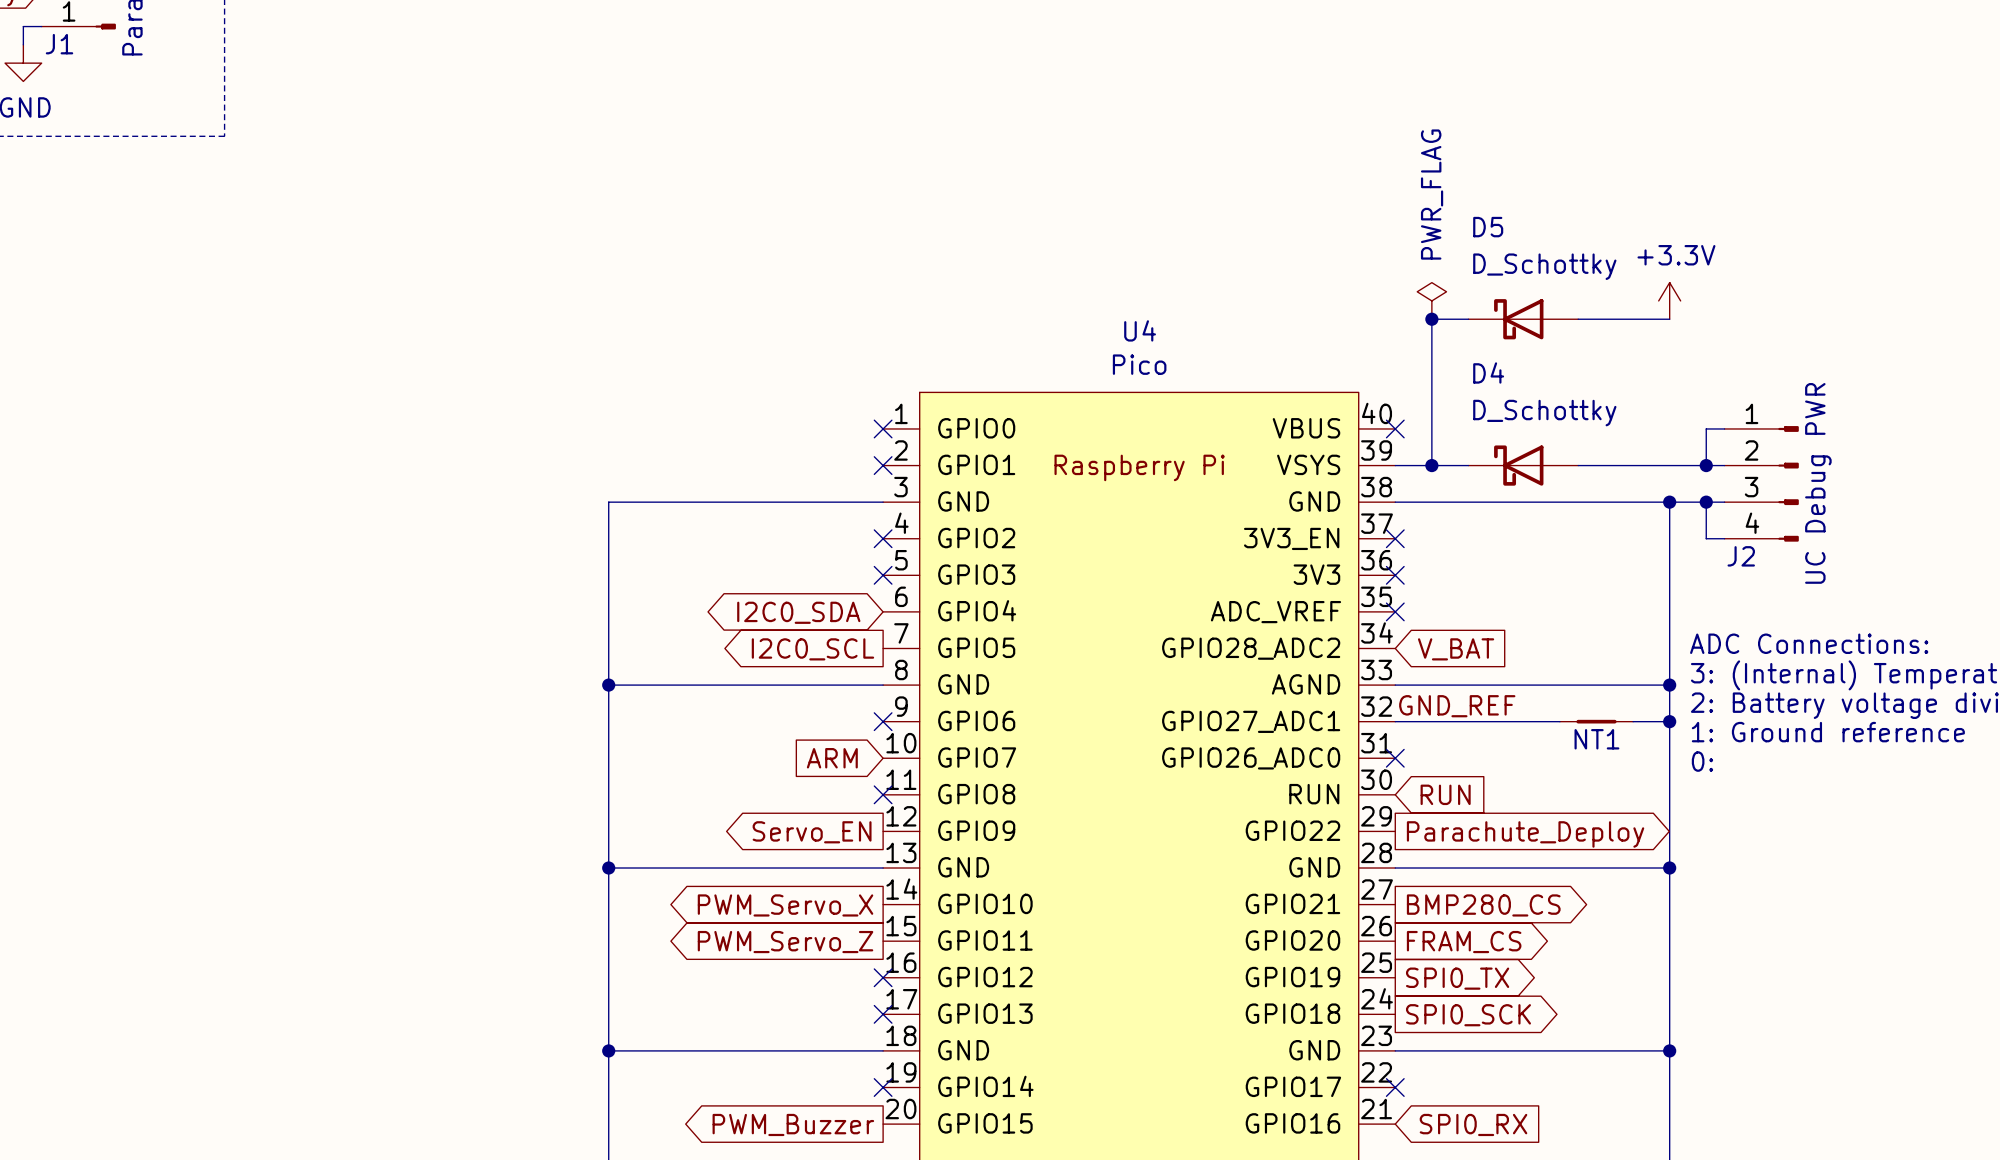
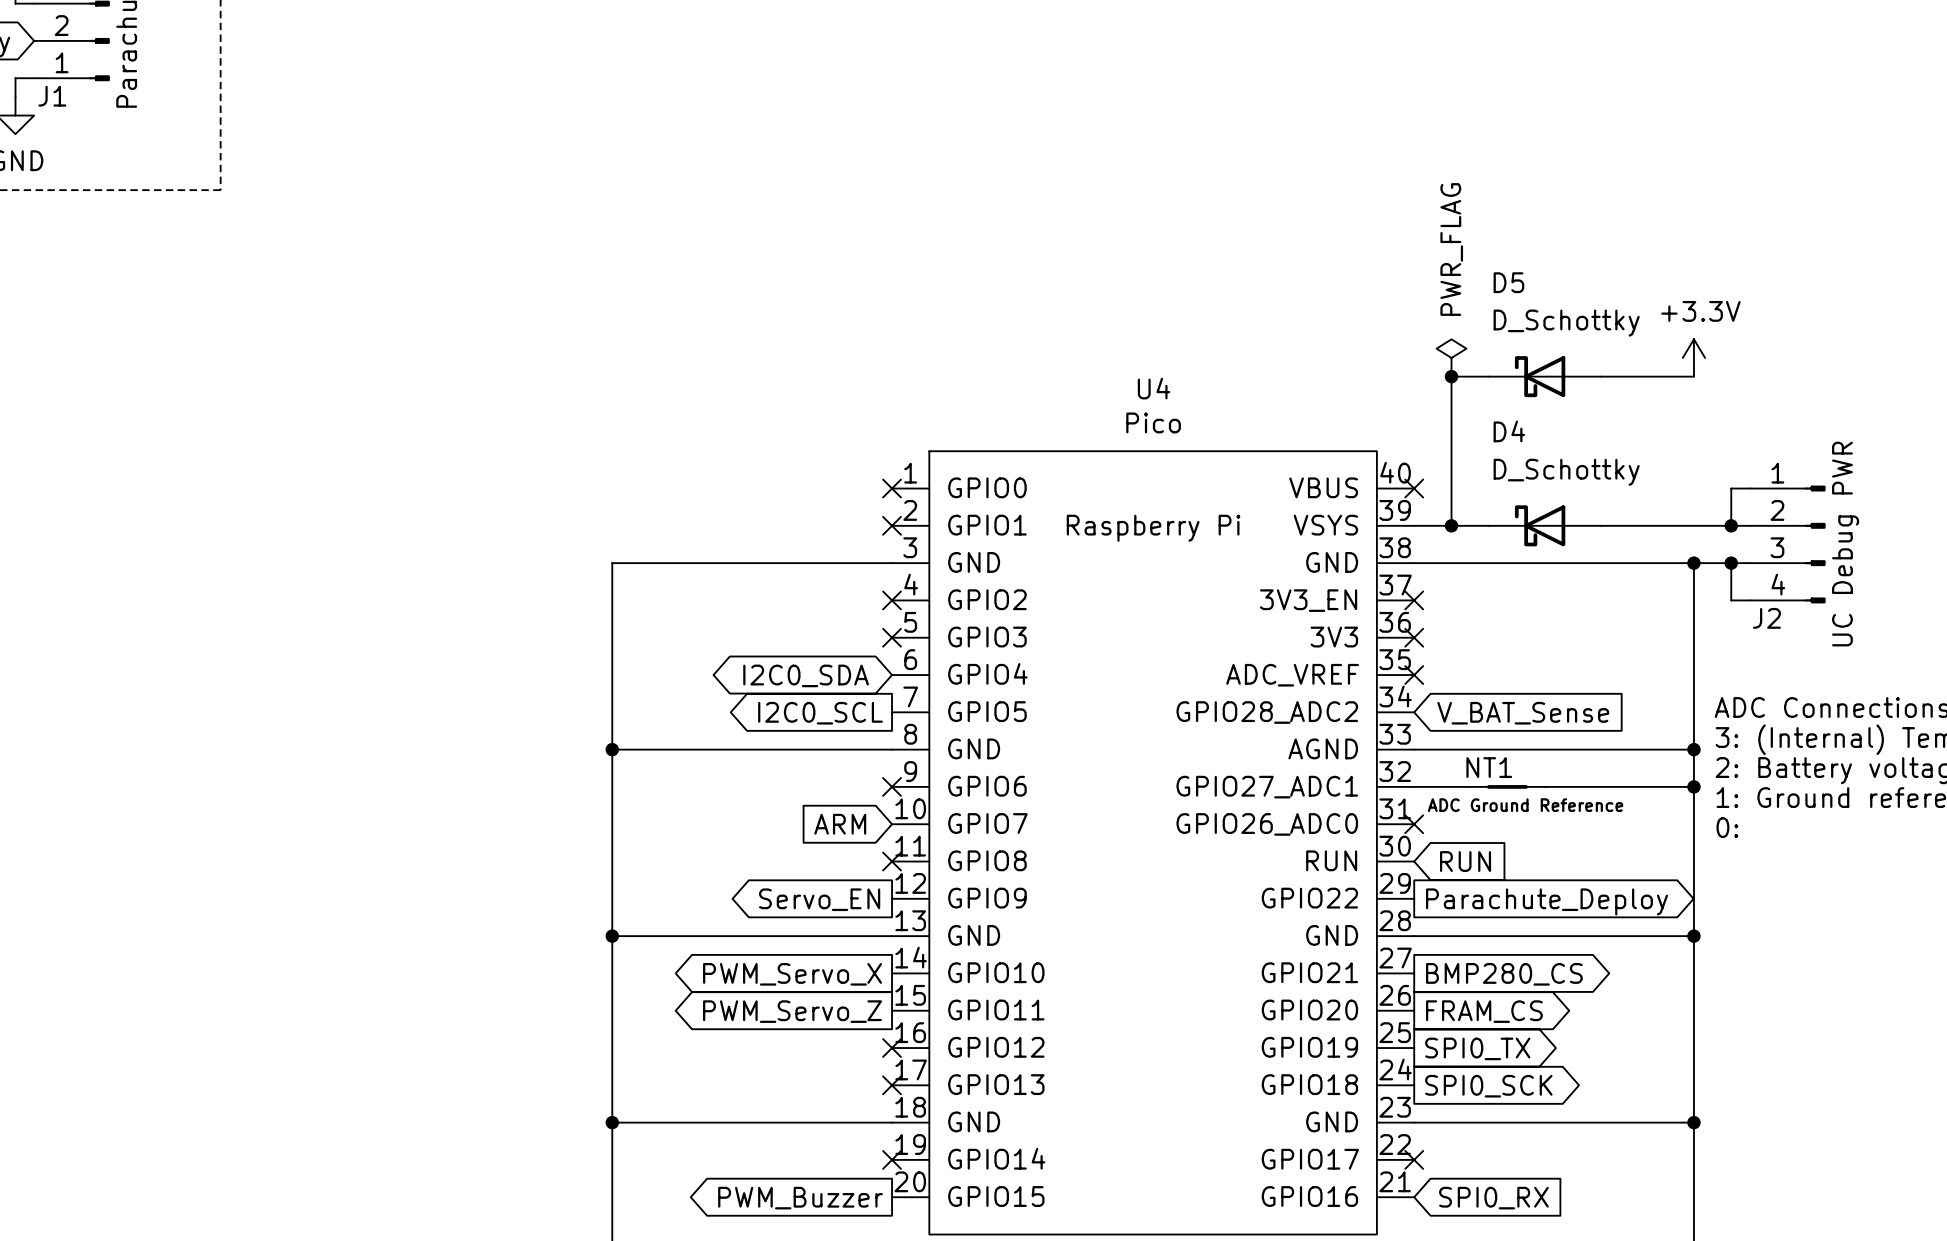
global label: V_BAT (1456, 649) -> V_BAT_Sense (1523, 713)
label: GND_REF (1457, 706) -> none
NT1 position: (1596, 721) -> (1507, 786)
NT1 value: none -> ADC Ground Reference (1525, 805)
NT1 name position: NT1 (1596, 739) -> NT1 (1489, 767)

